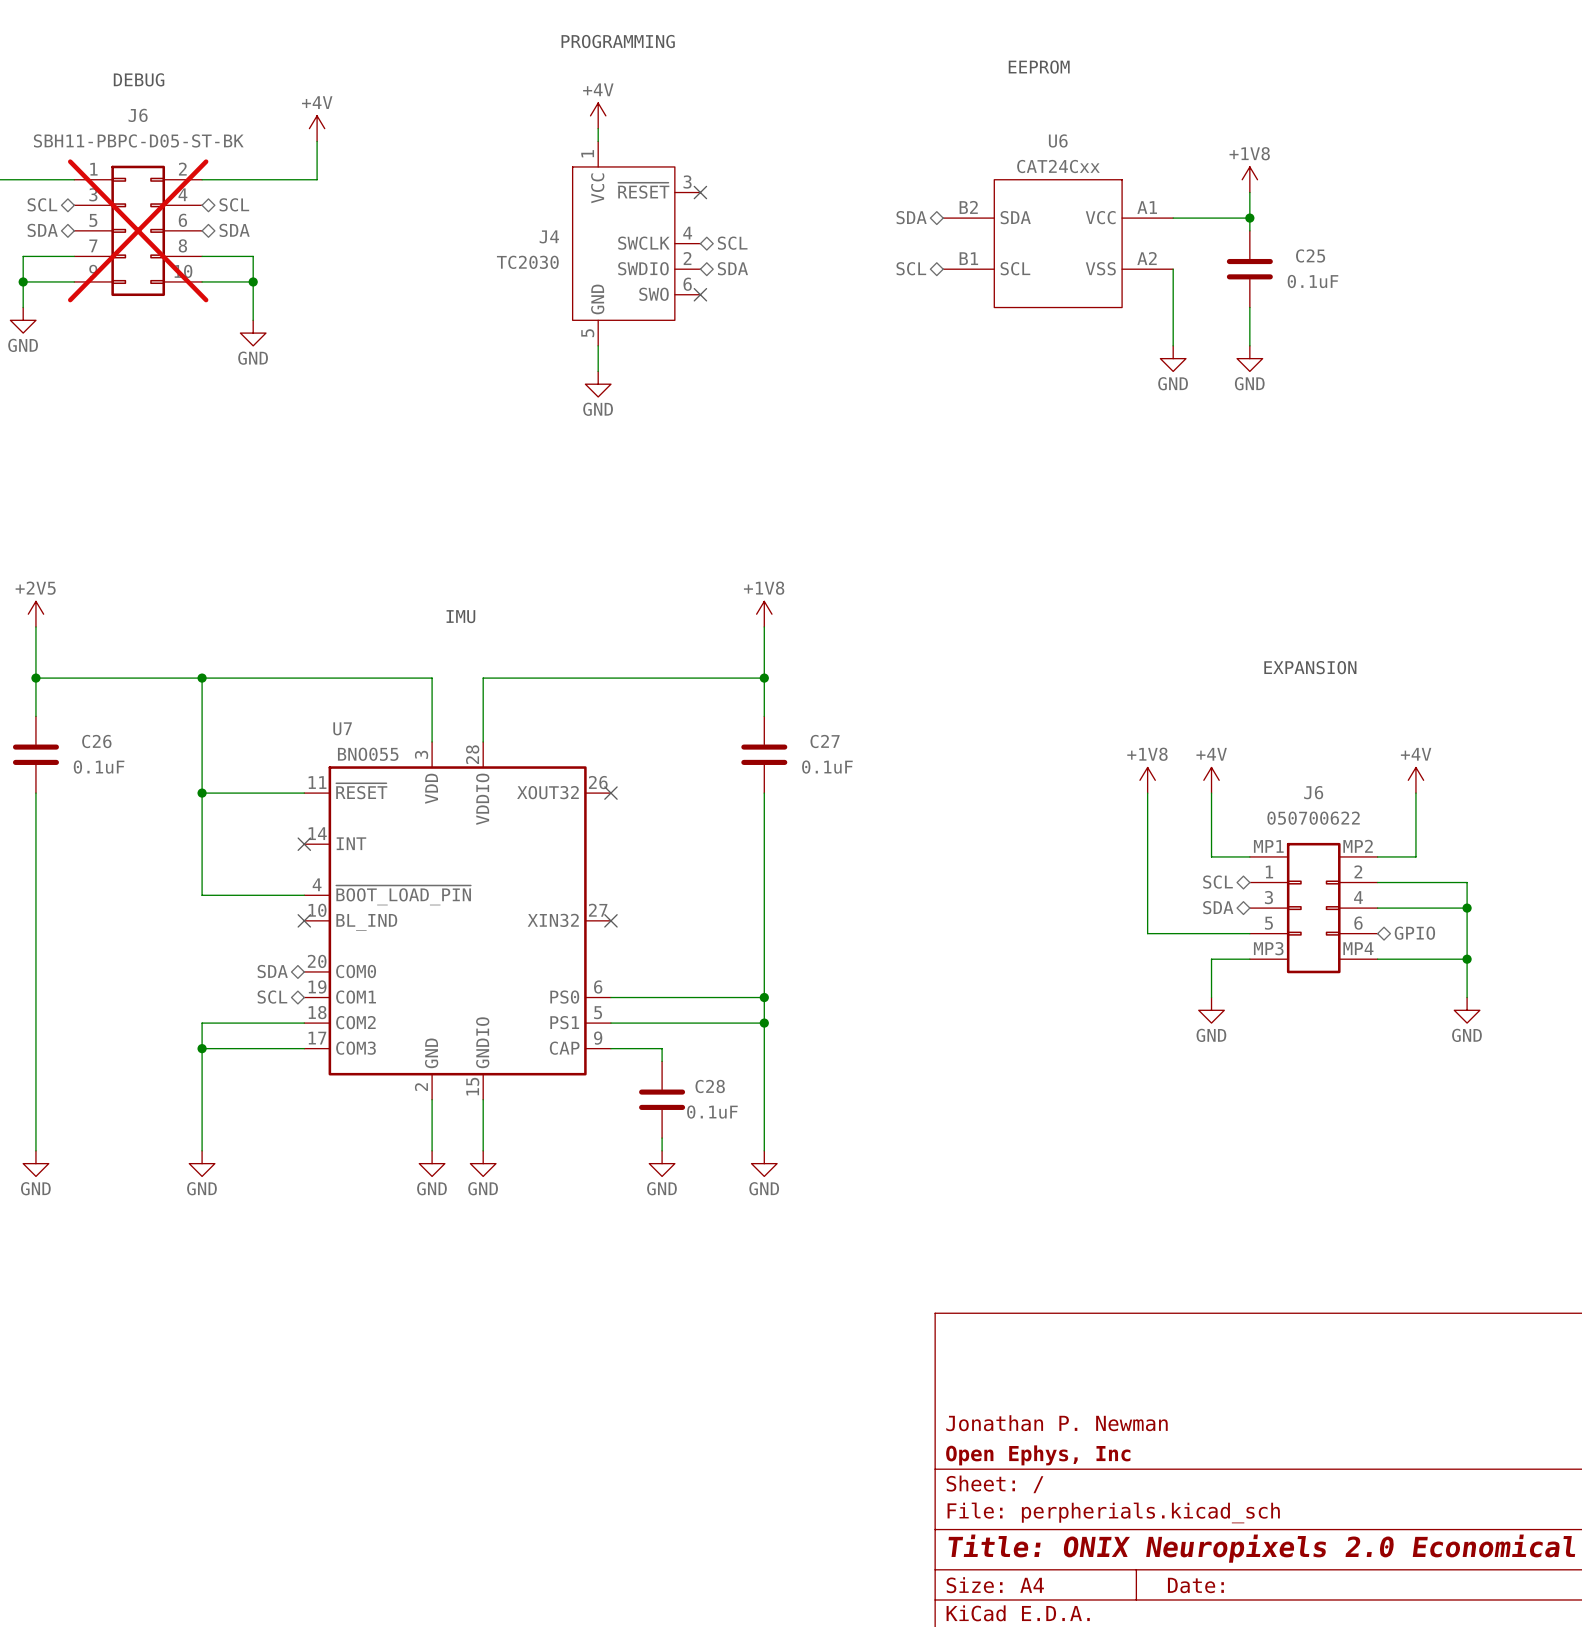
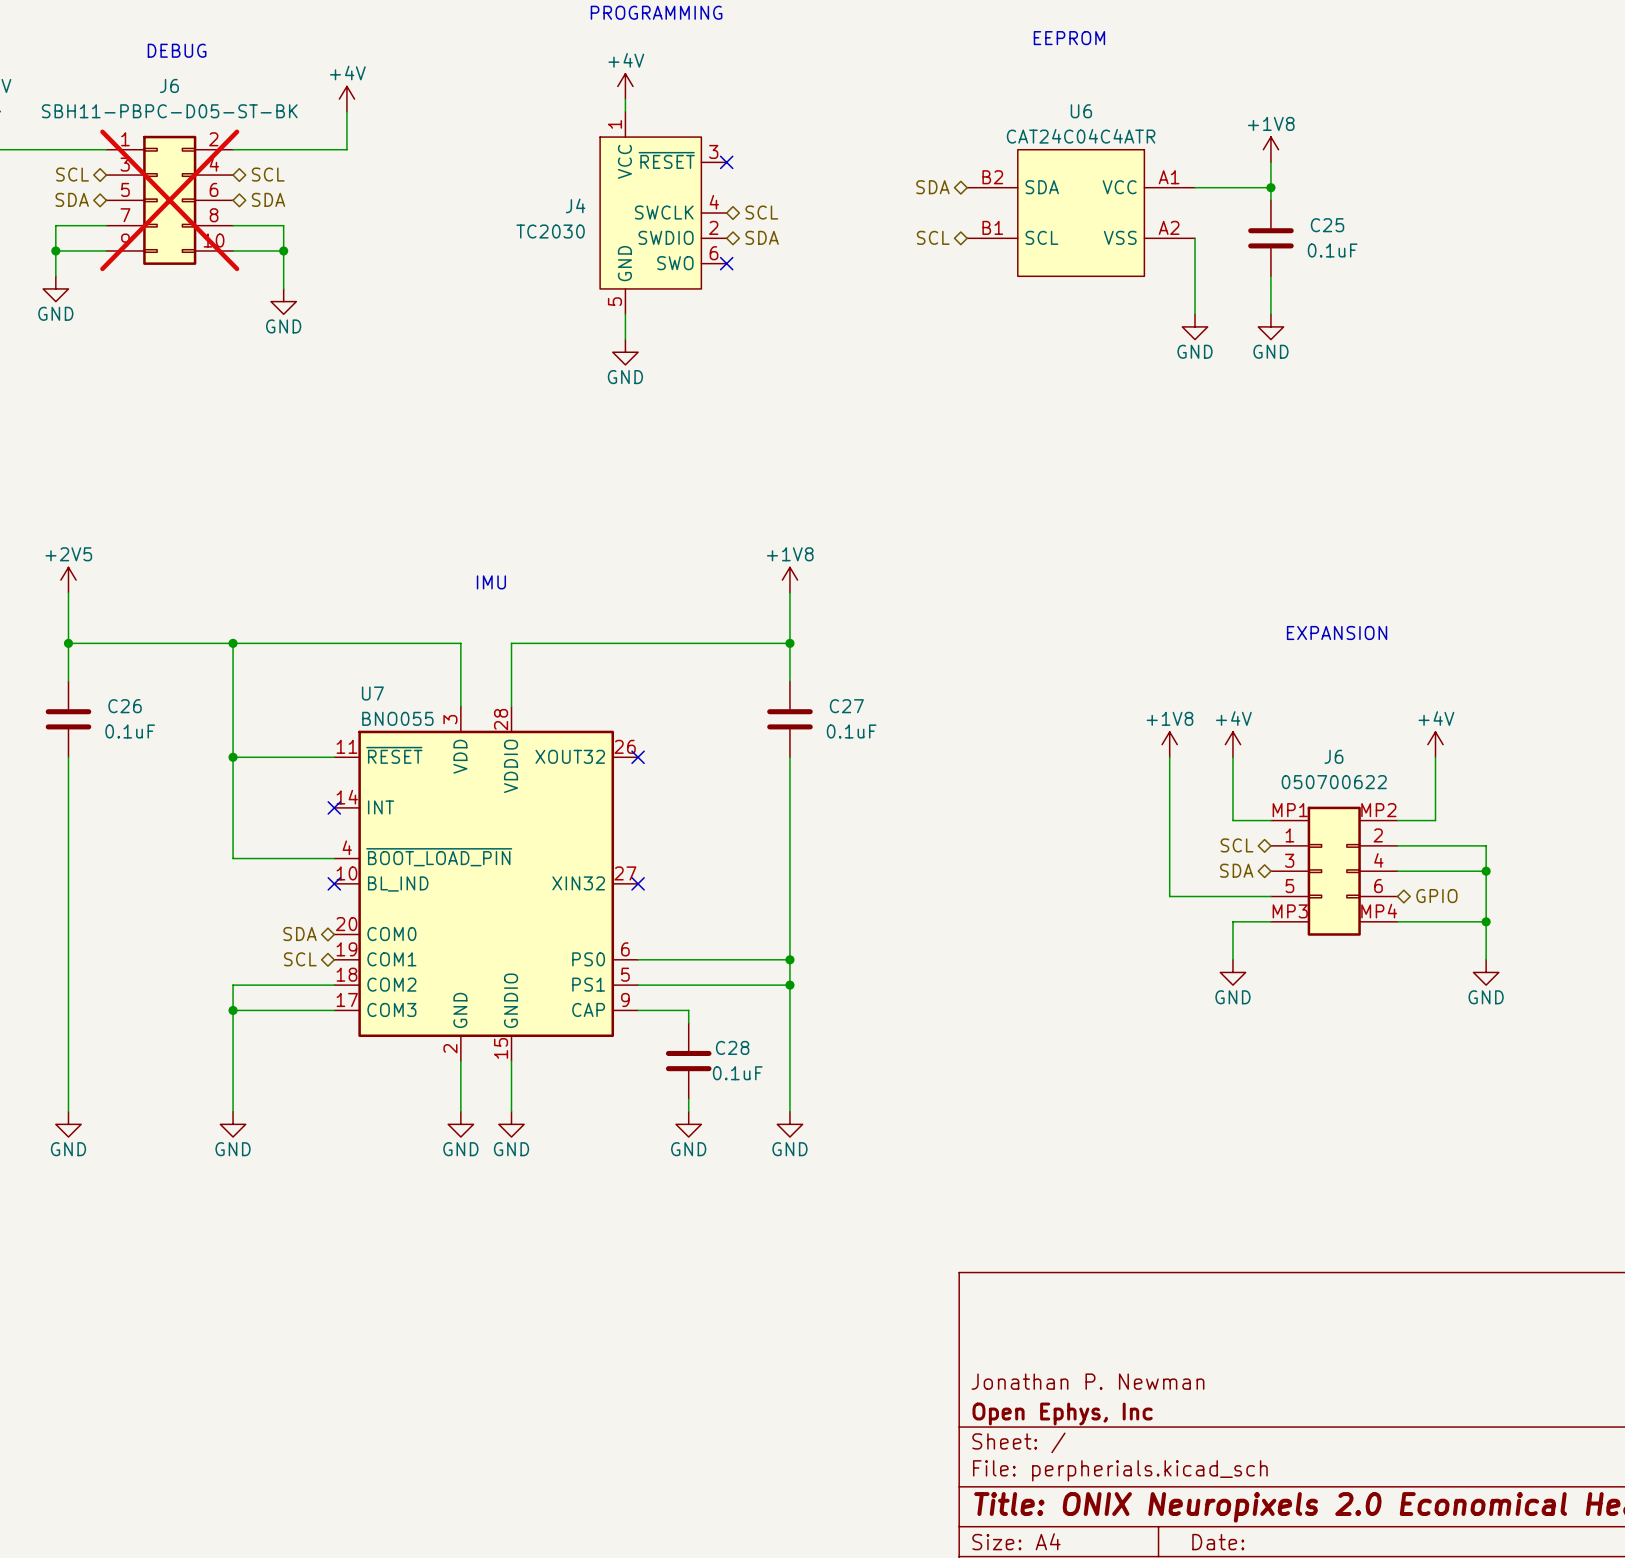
U6 value: CAT24Cxx (1058, 166) -> CAT24C04C4ATR (1081, 136)

